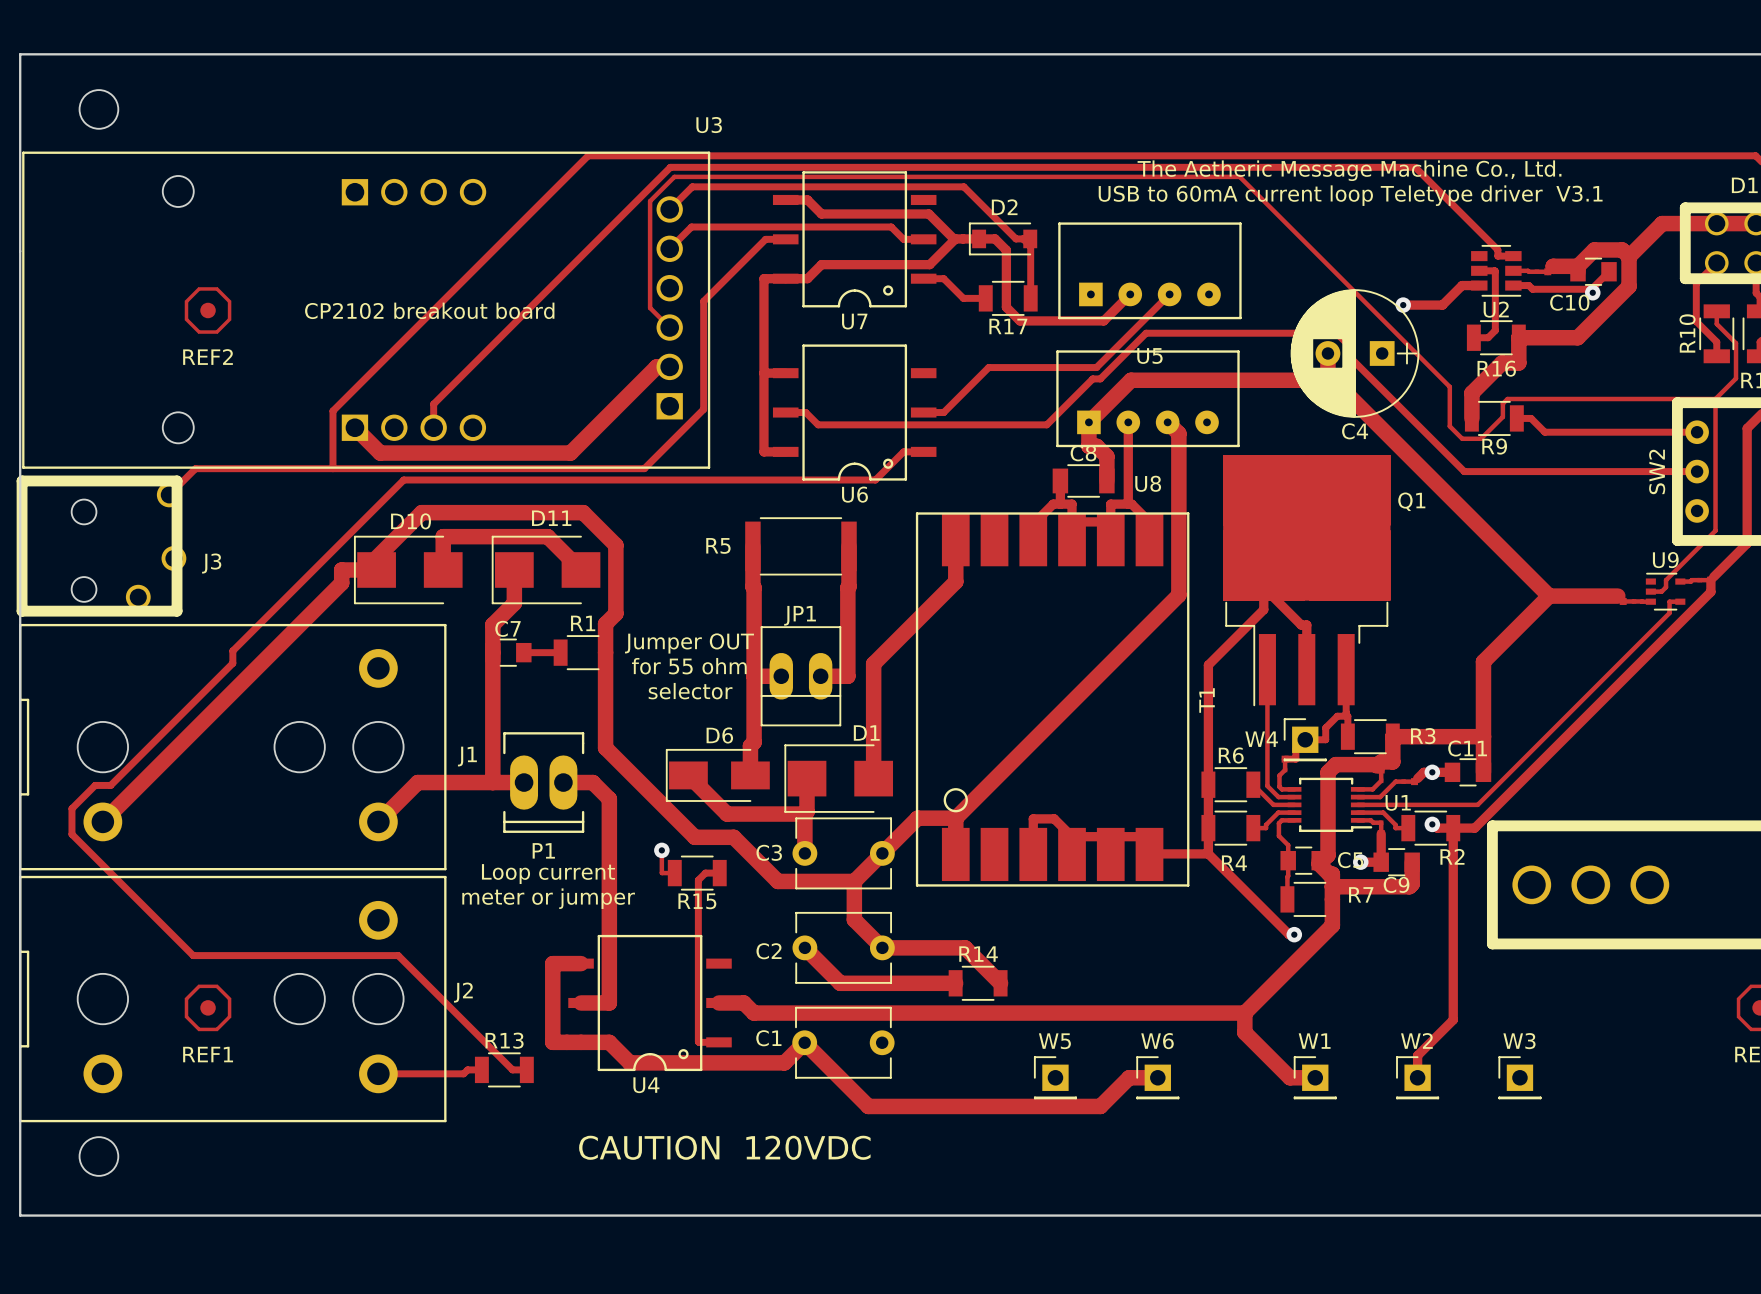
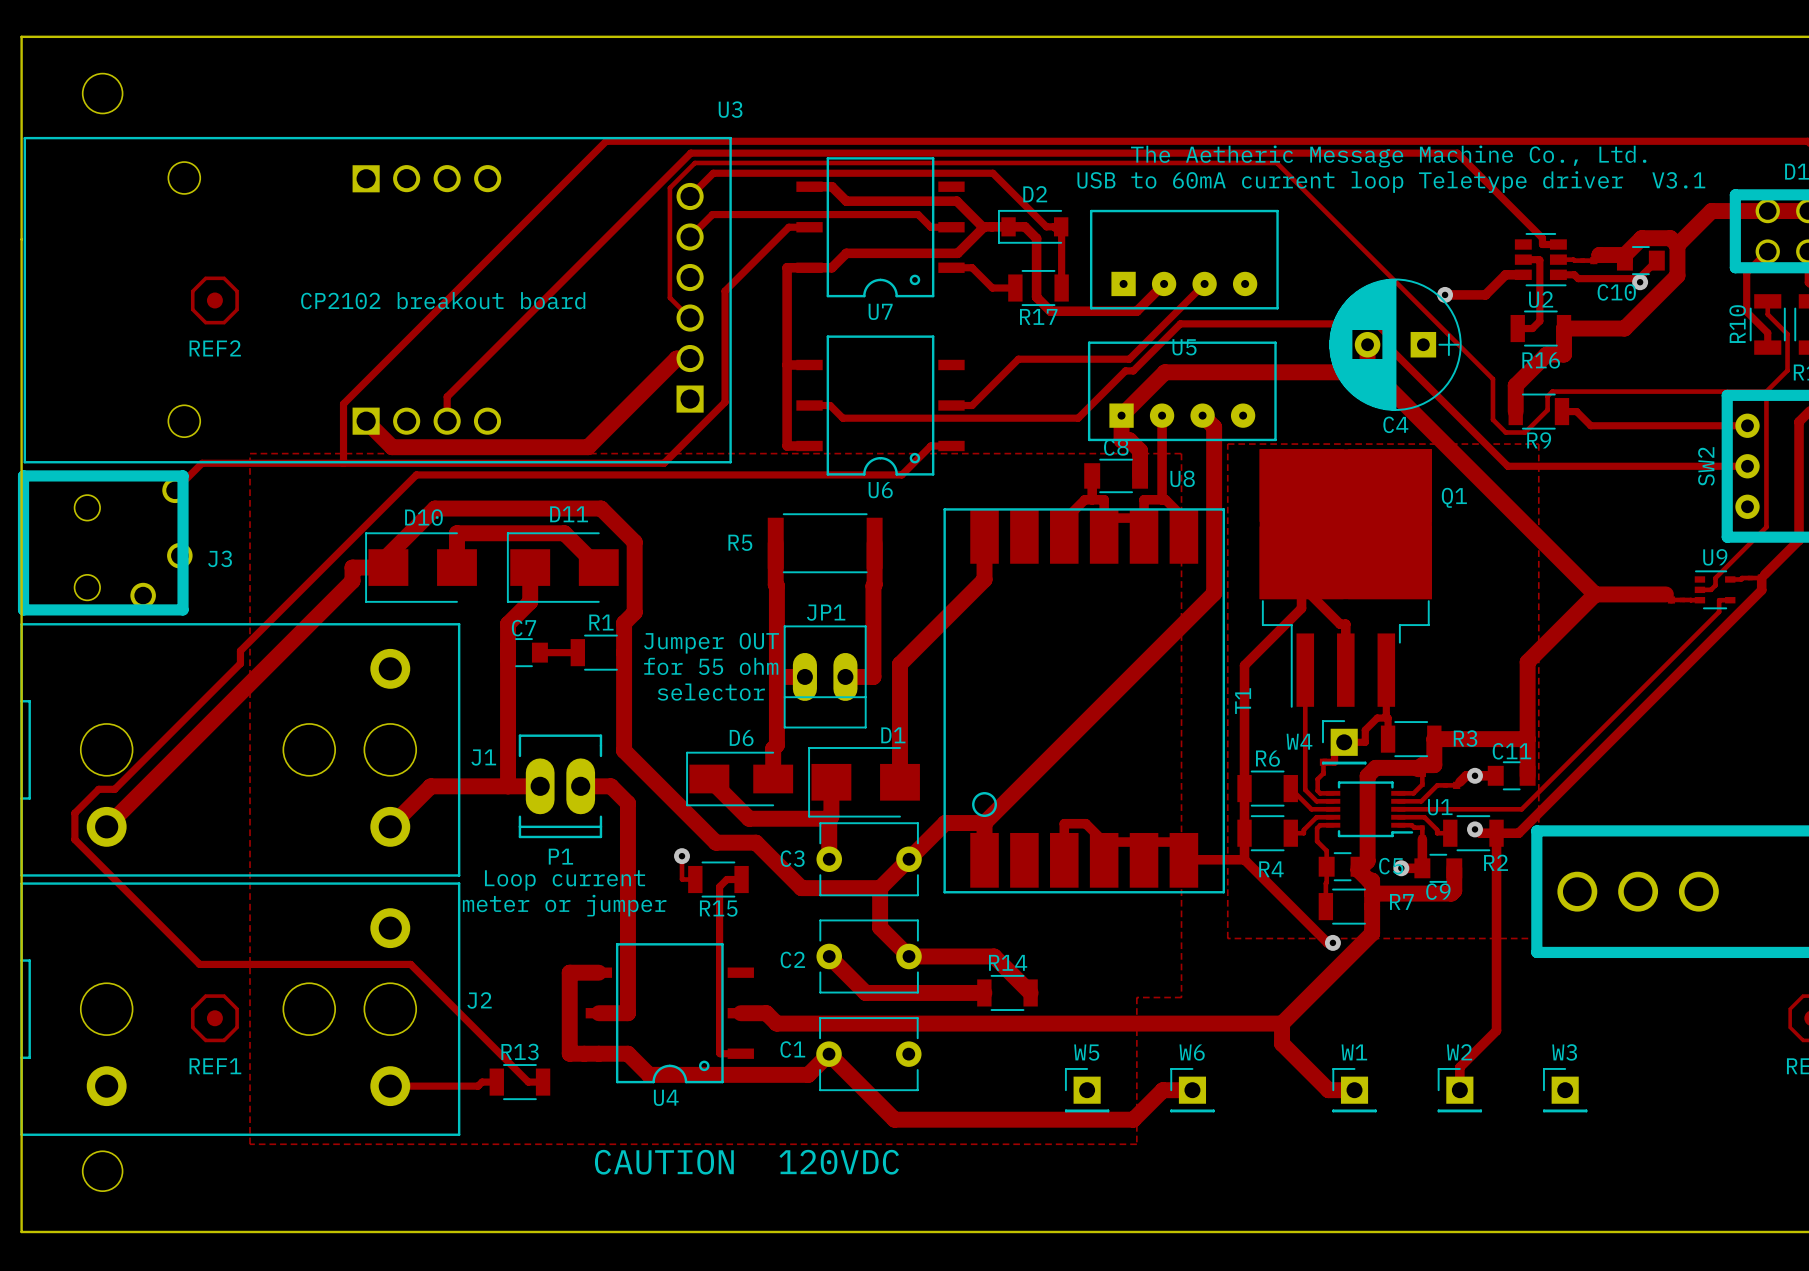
zone outline: none -> (1227, 444) (1227, 938) (1538, 938) (1538, 444) (1227, 444)
zone outline: none -> (250, 453) (250, 1144) (1136, 1144) (1136, 997) (1181, 997) (1181, 453) (250, 453)

